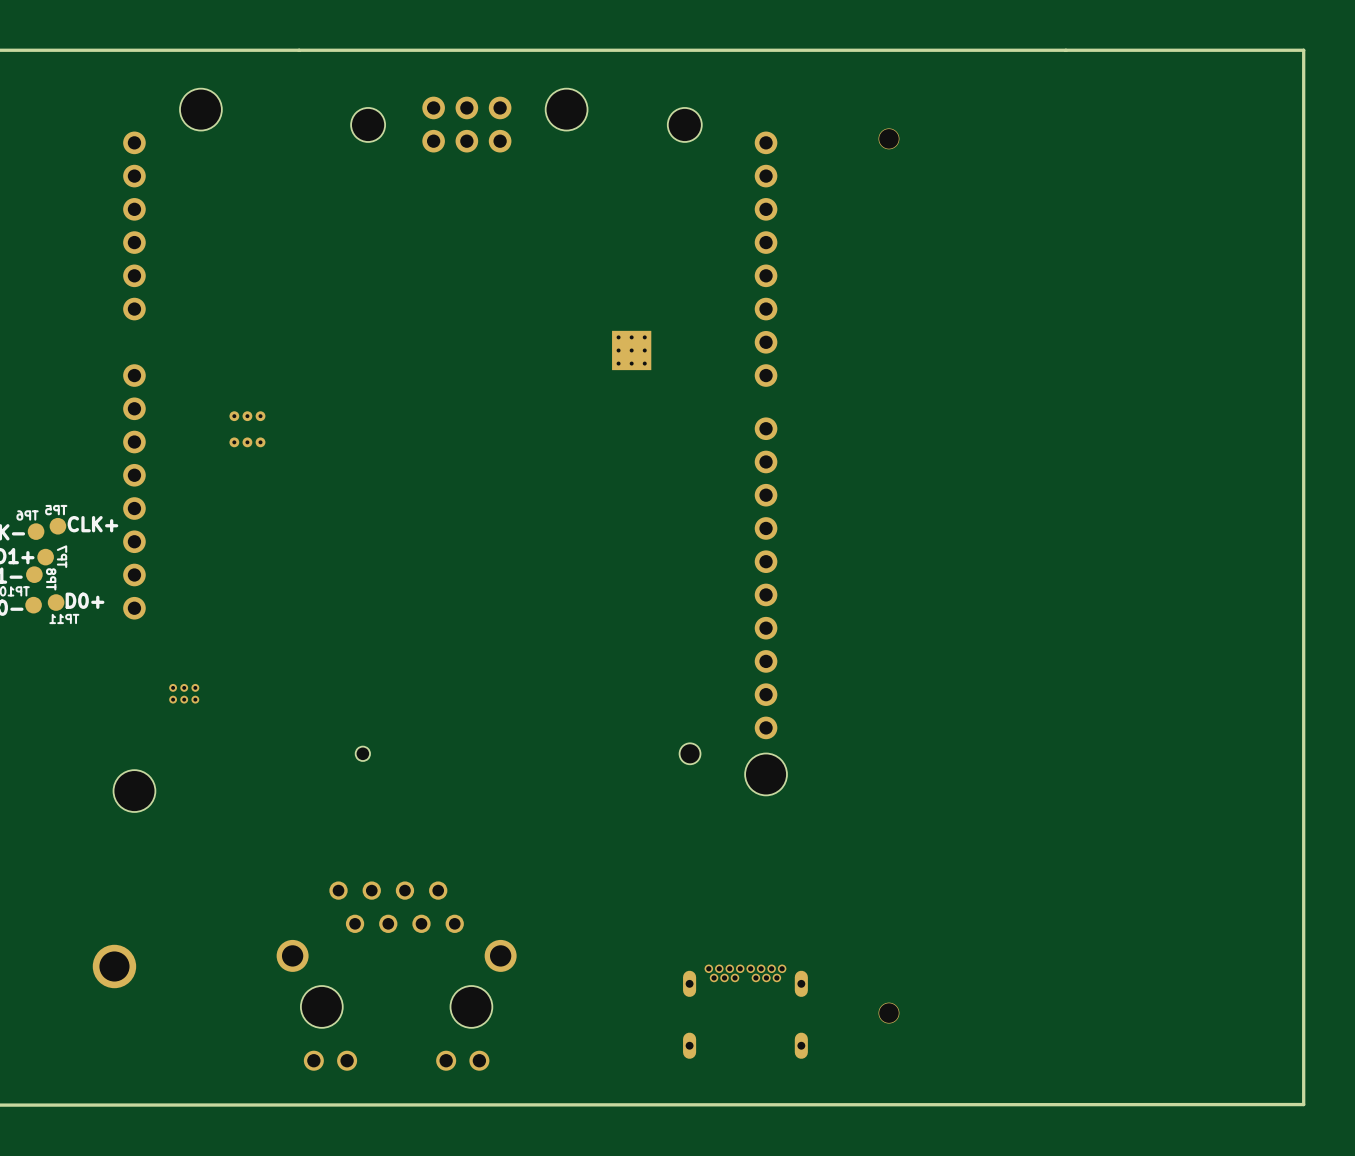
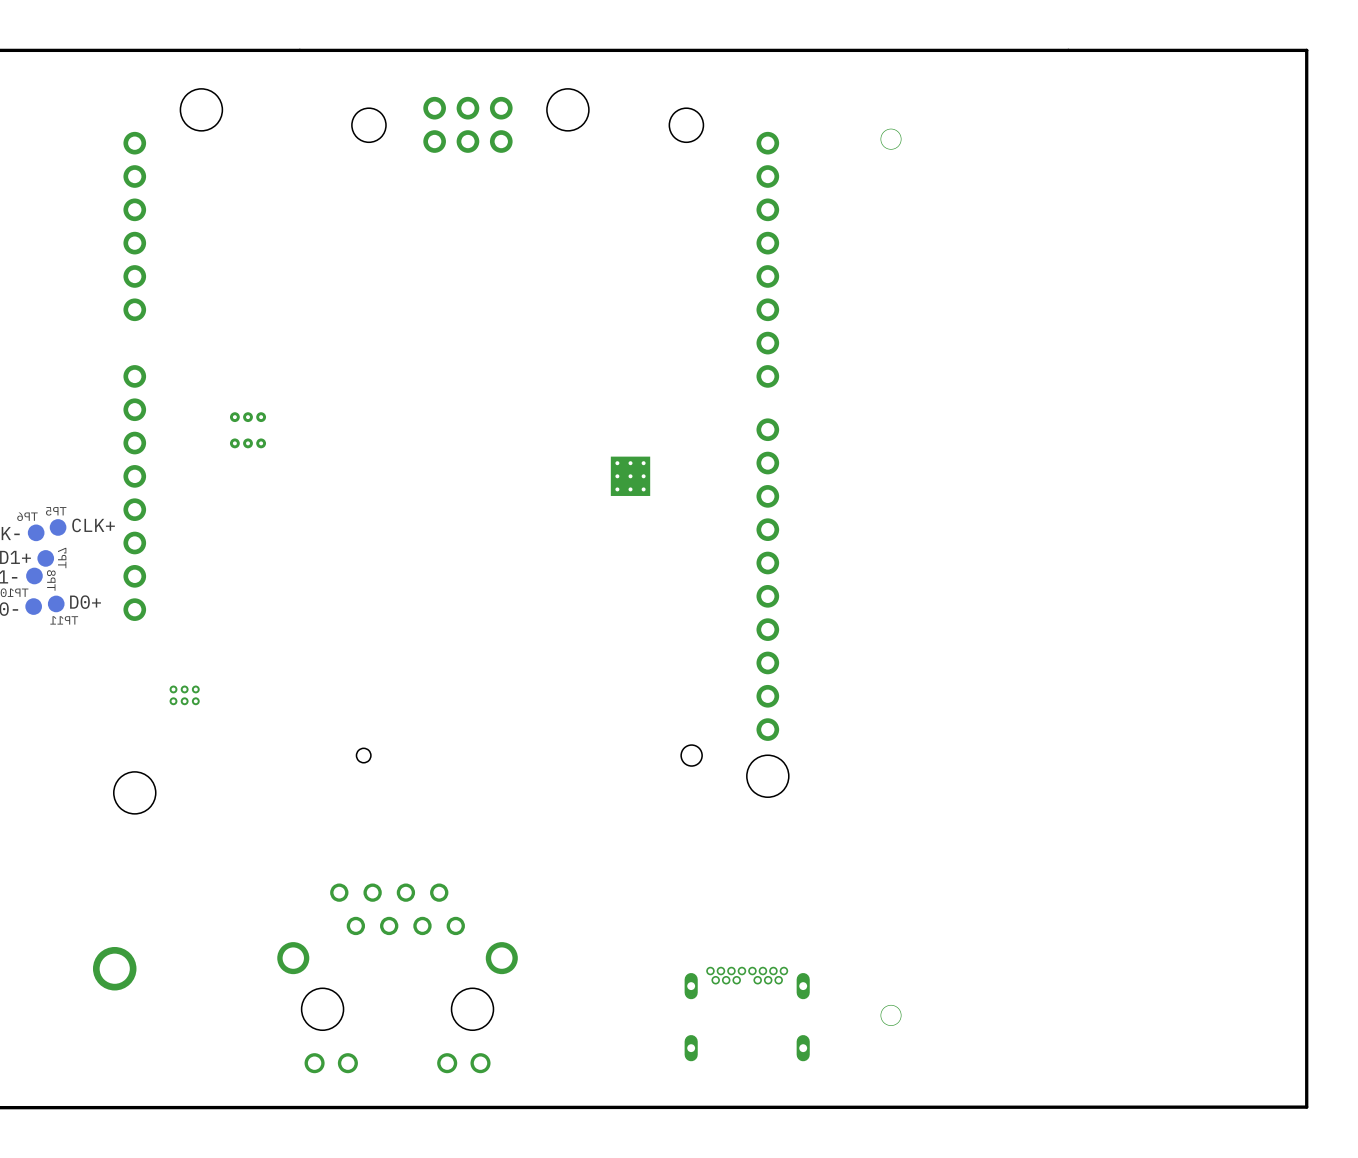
part position: (631, 350) -> (630, 476)

